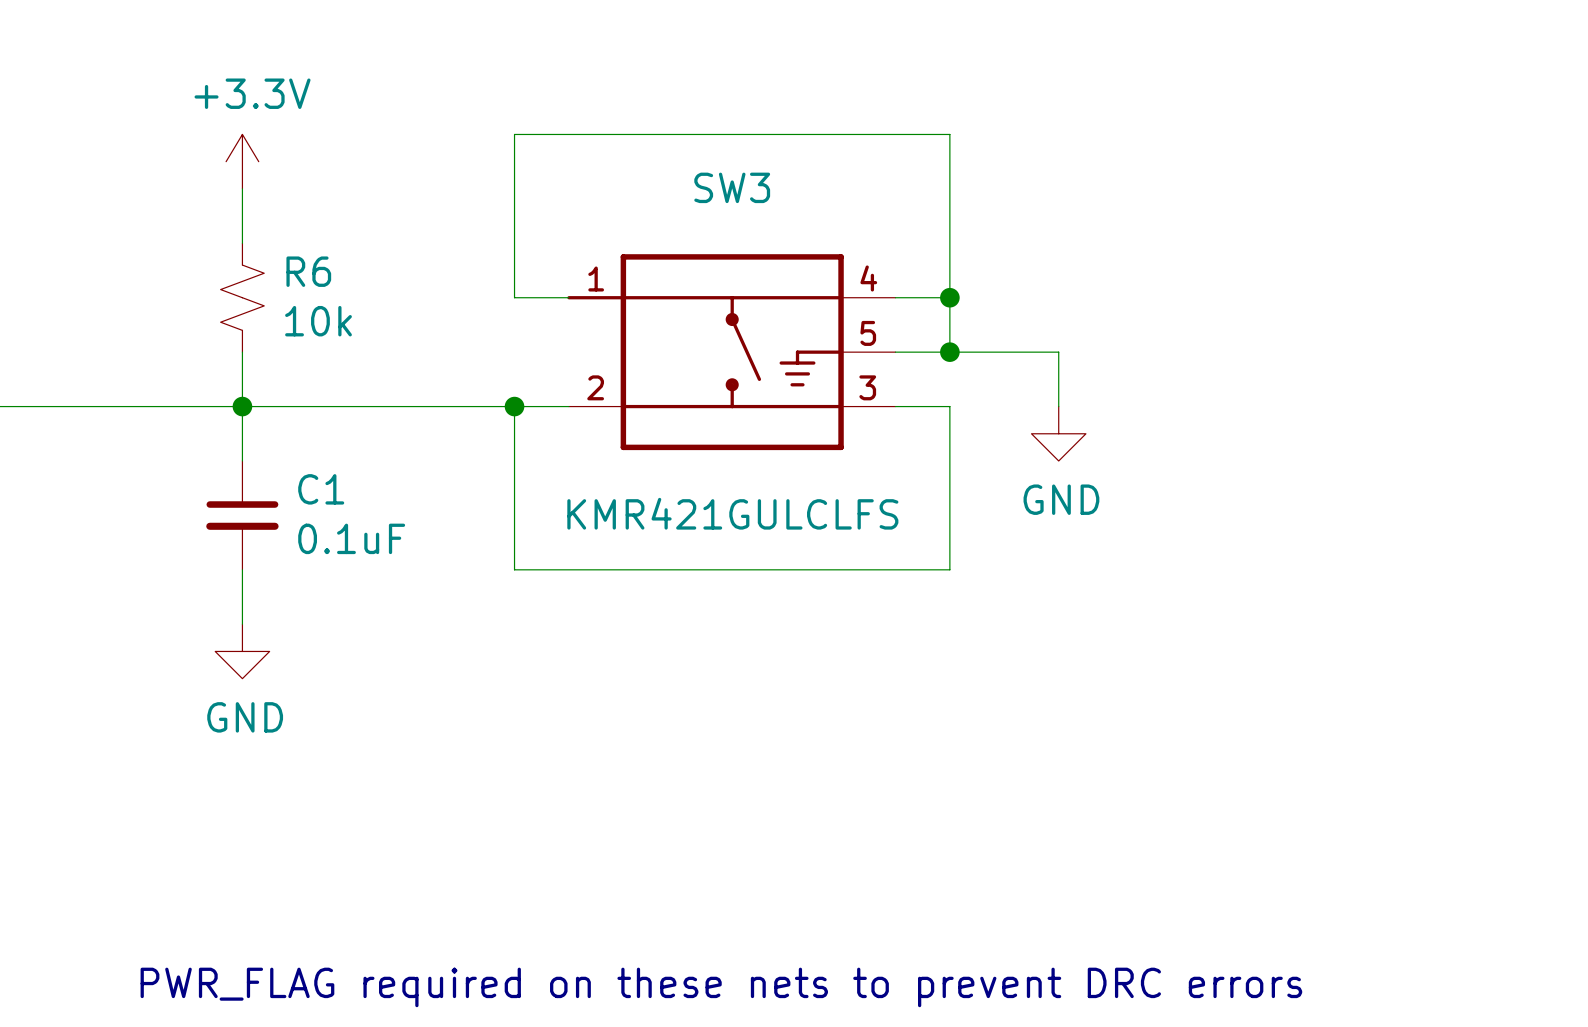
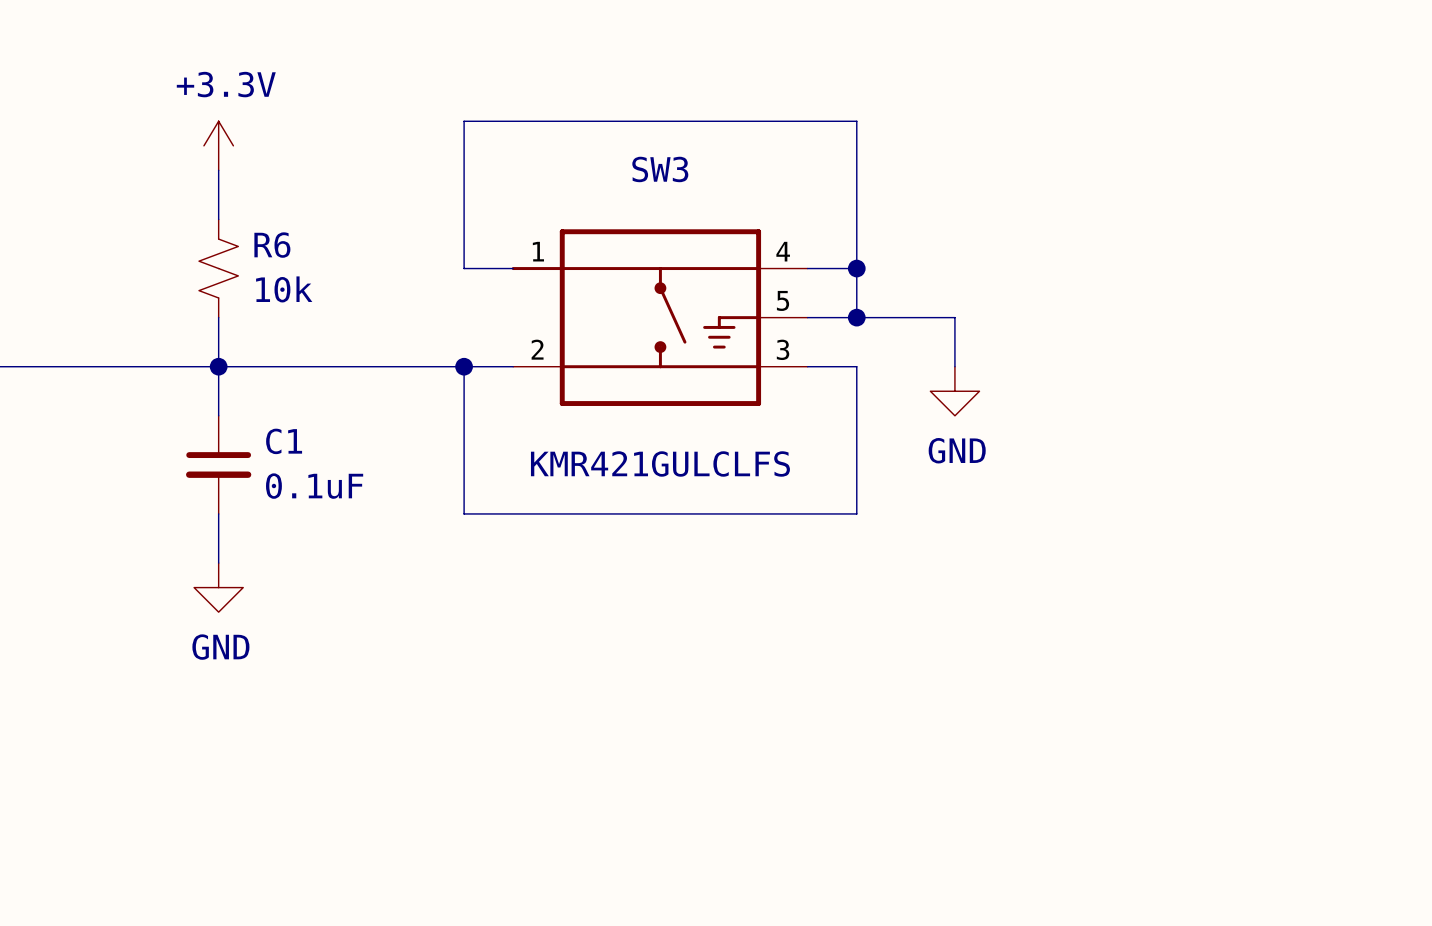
text: PWR_FLAG required on these nets to prevent DRC errors (721, 987) -> none

